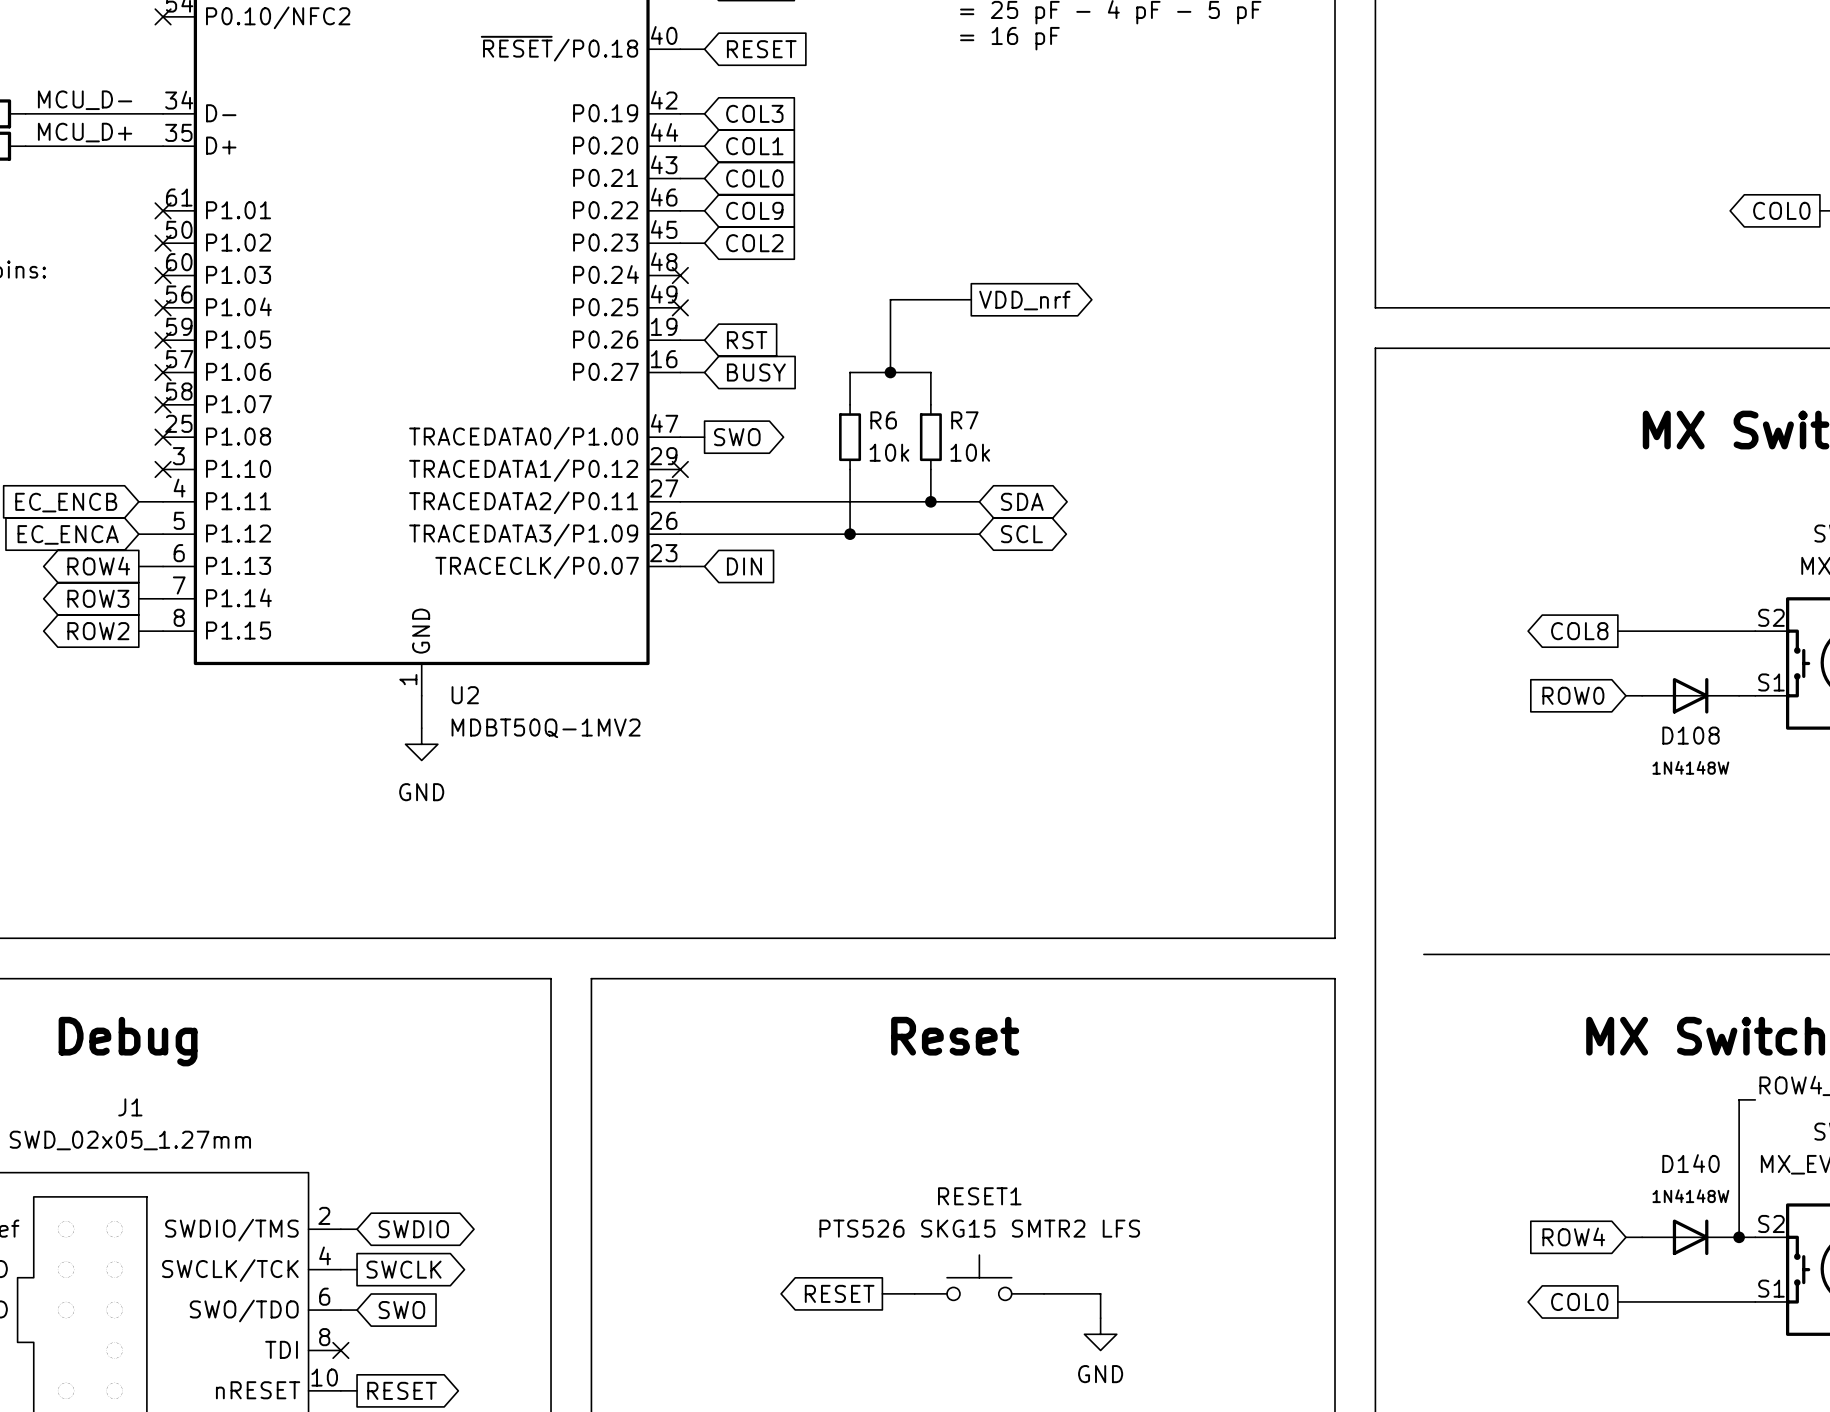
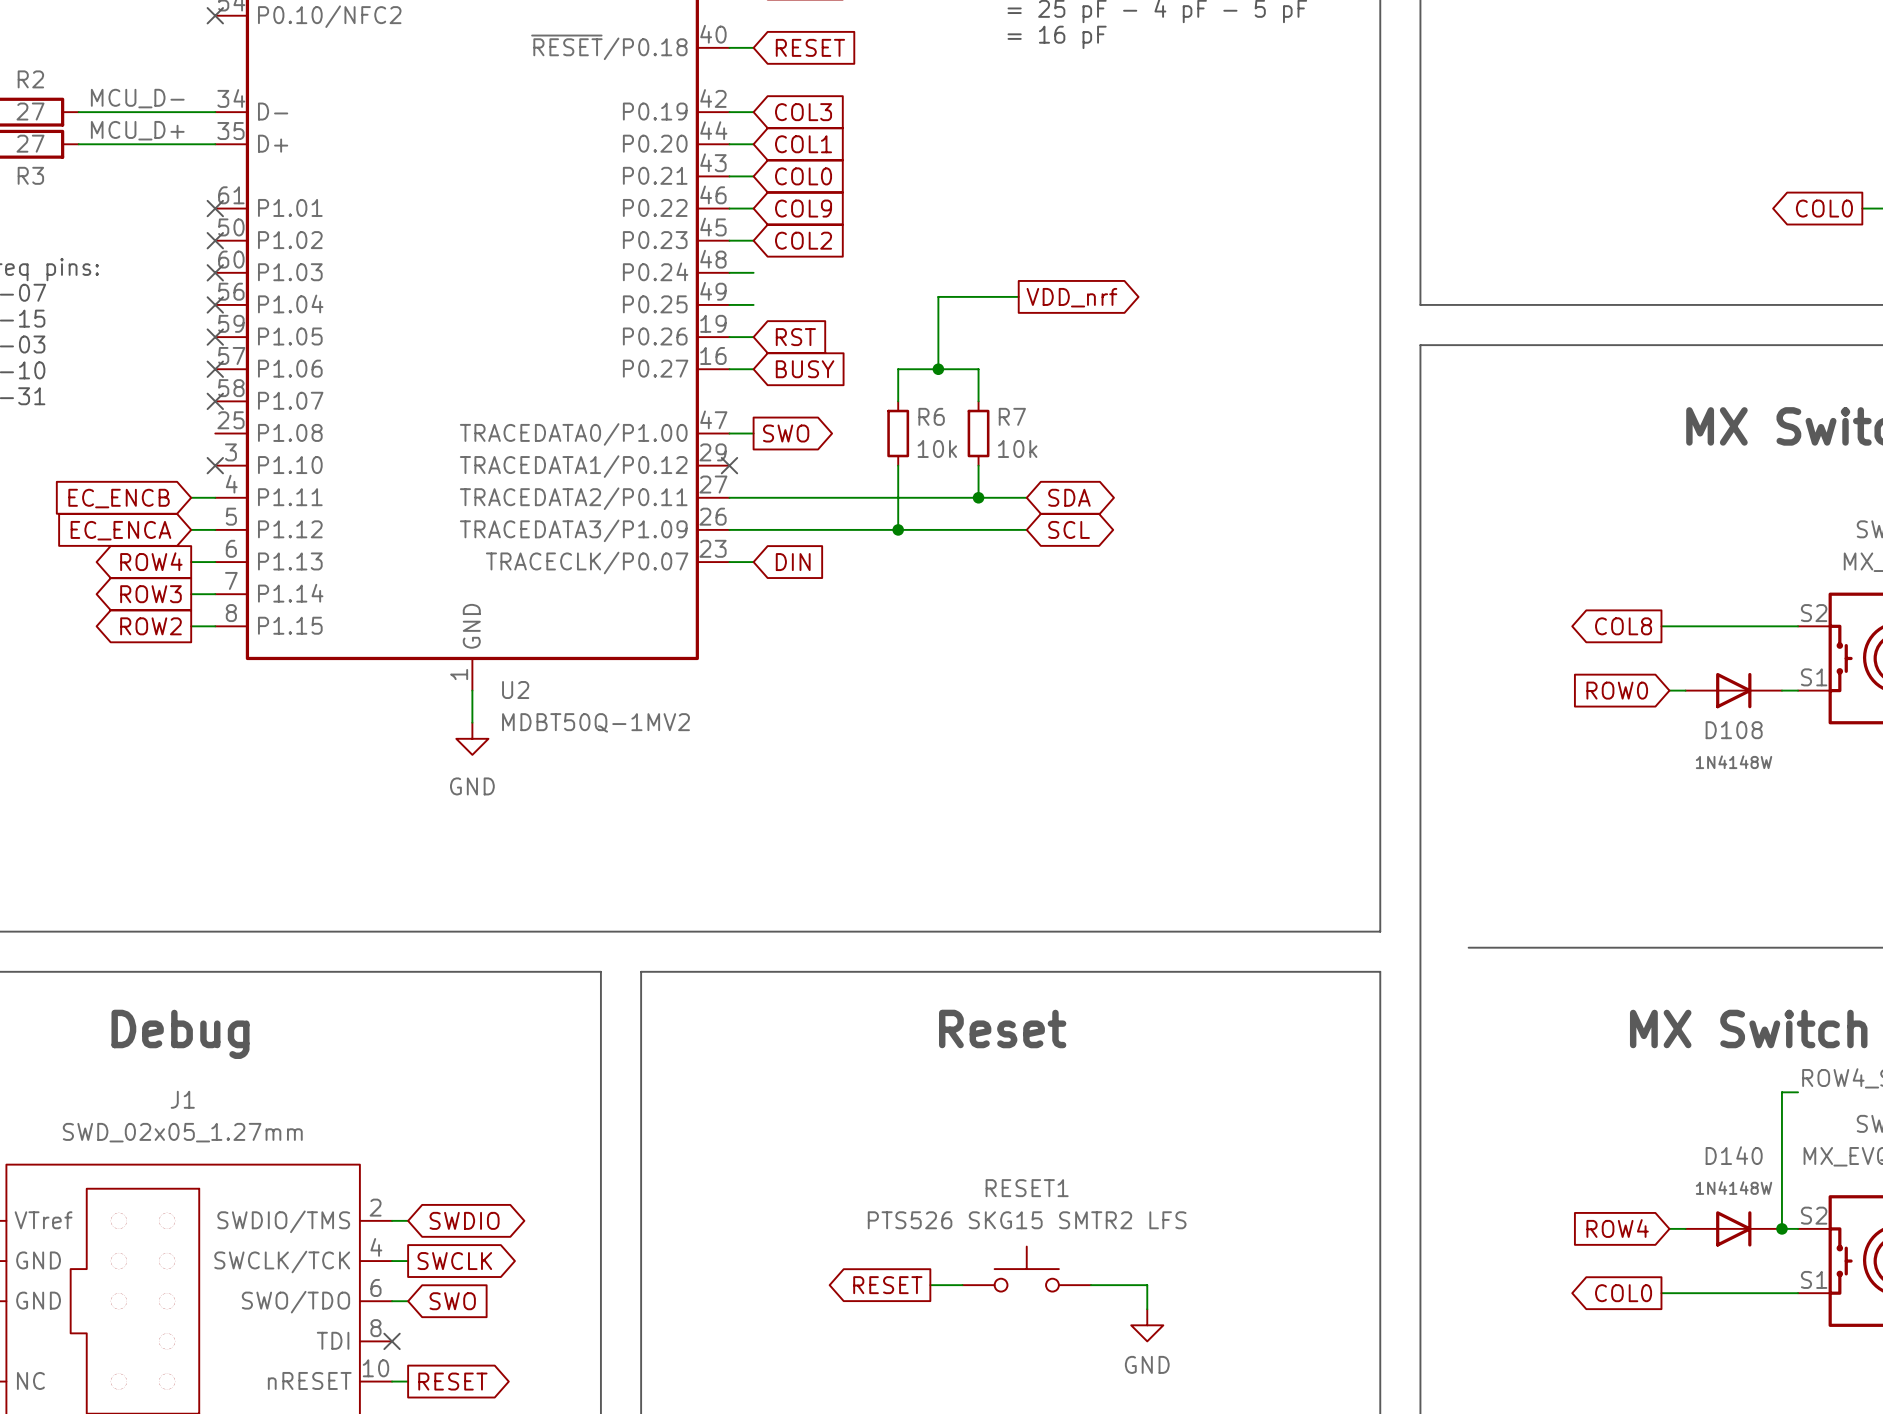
wire: none -> (729, 272) (753, 272)
no-connect mark: (680, 275) -> none
wire: none -> (729, 304) (753, 304)
no-connect mark: (680, 307) -> none
no-connect mark: (163, 437) -> none

